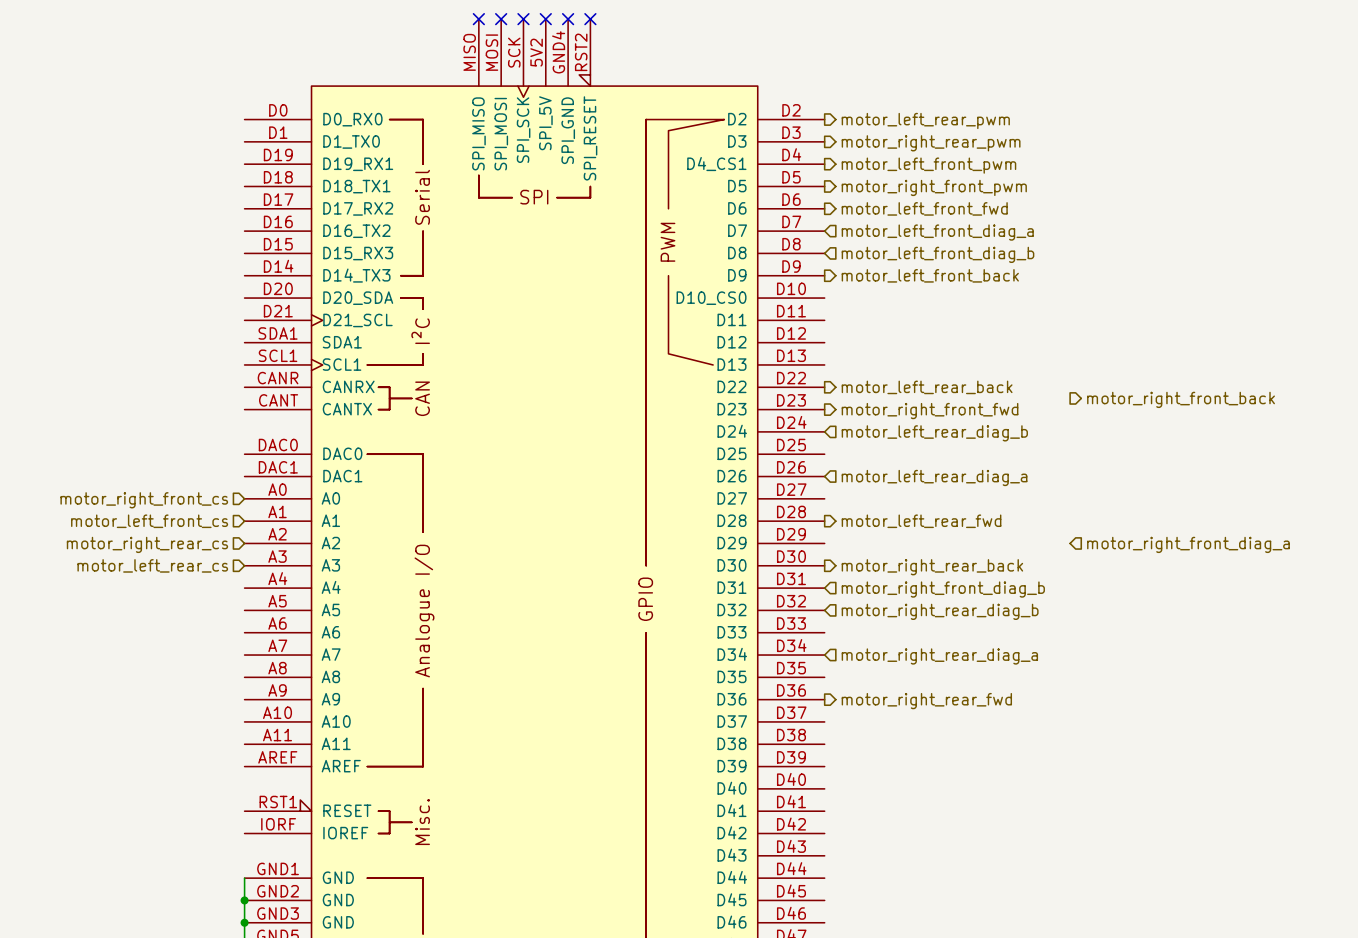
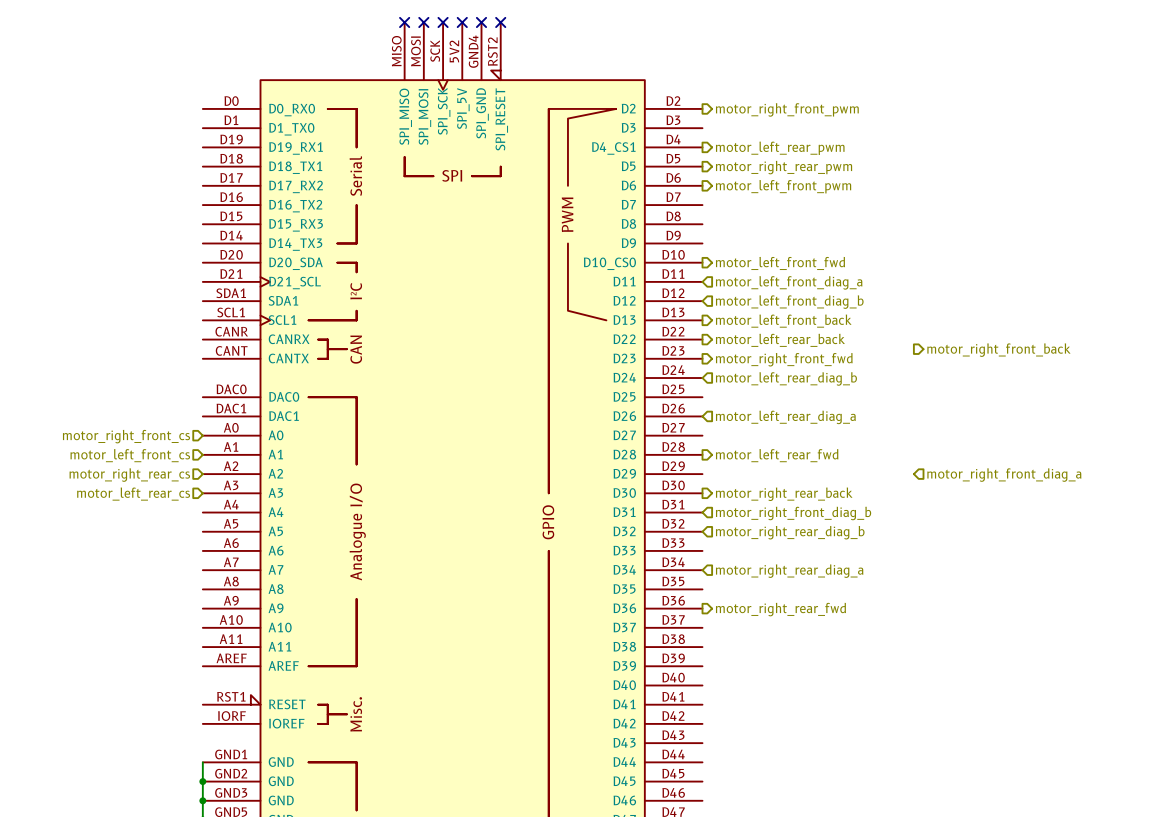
hierarchical label: motor_left_rear_pwm (925, 120) -> motor_right_front_pwm (787, 109)
hierarchical label: motor_right_rear_pwm (931, 143) -> none
hierarchical label: motor_left_front_pwm (928, 165) -> motor_left_rear_pwm (780, 148)
hierarchical label: motor_right_front_pwm (934, 187) -> motor_right_rear_pwm (784, 167)
hierarchical label: motor_left_front_fwd (924, 208) -> motor_left_front_pwm (783, 186)
hierarchical label position: motor_left_front_diag_a (937, 232) -> motor_left_front_diag_a (789, 282)
hierarchical label position: motor_left_front_diag_b (938, 254) -> motor_left_front_diag_b (789, 302)
hierarchical label position: motor_left_front_back (930, 275) -> motor_left_front_back (783, 321)
hierarchical label: none -> motor_left_front_fwd (780, 263)

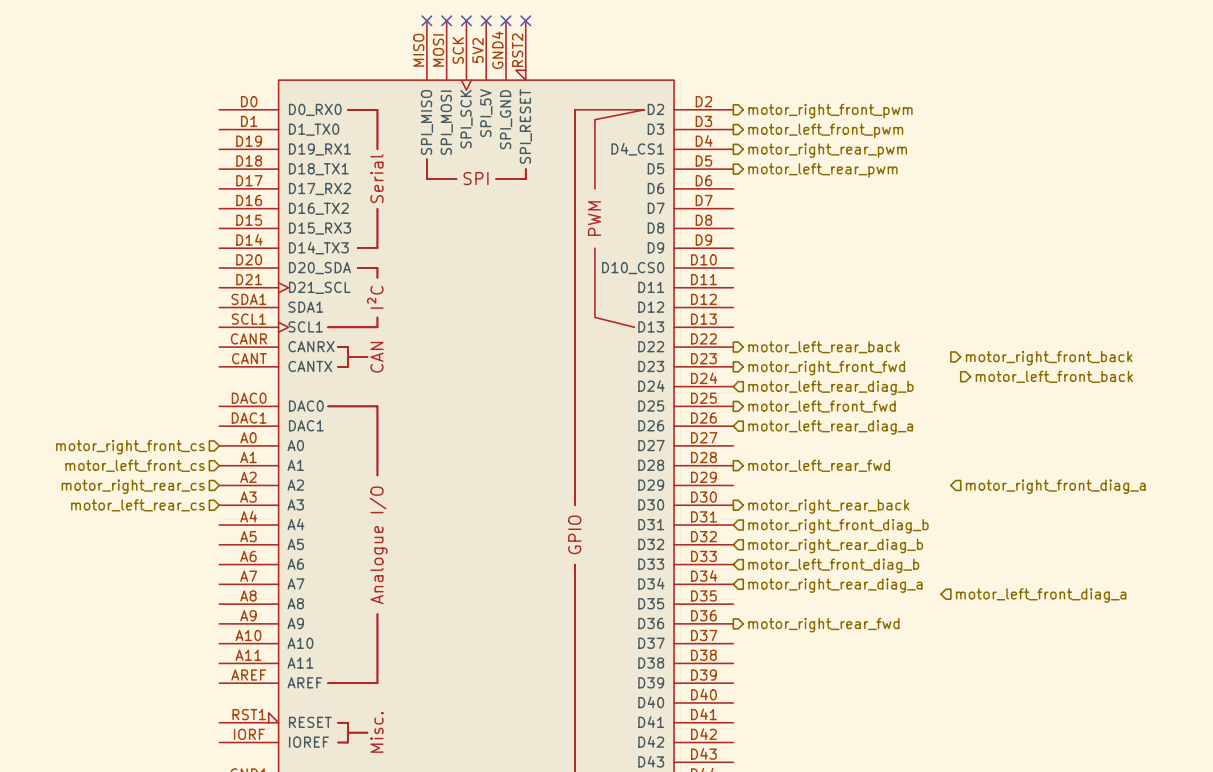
hierarchical label: motor_left_rear_pwm (780, 148) -> motor_right_rear_pwm (827, 150)
hierarchical label: motor_right_rear_pwm (784, 167) -> motor_left_rear_pwm (822, 170)
hierarchical label position: motor_left_front_pwm (783, 186) -> motor_left_front_pwm (825, 130)
hierarchical label position: motor_left_front_fwd (780, 263) -> motor_left_front_fwd (822, 406)
hierarchical label: motor_left_front_diag_a (789, 282) -> none
hierarchical label: motor_left_front_diag_b (789, 302) -> none
hierarchical label: motor_left_front_back (783, 321) -> none
hierarchical label: none -> motor_left_front_back (1054, 376)
hierarchical label: none -> motor_left_front_diag_b (833, 565)
hierarchical label: none -> motor_left_front_diag_a (1041, 595)

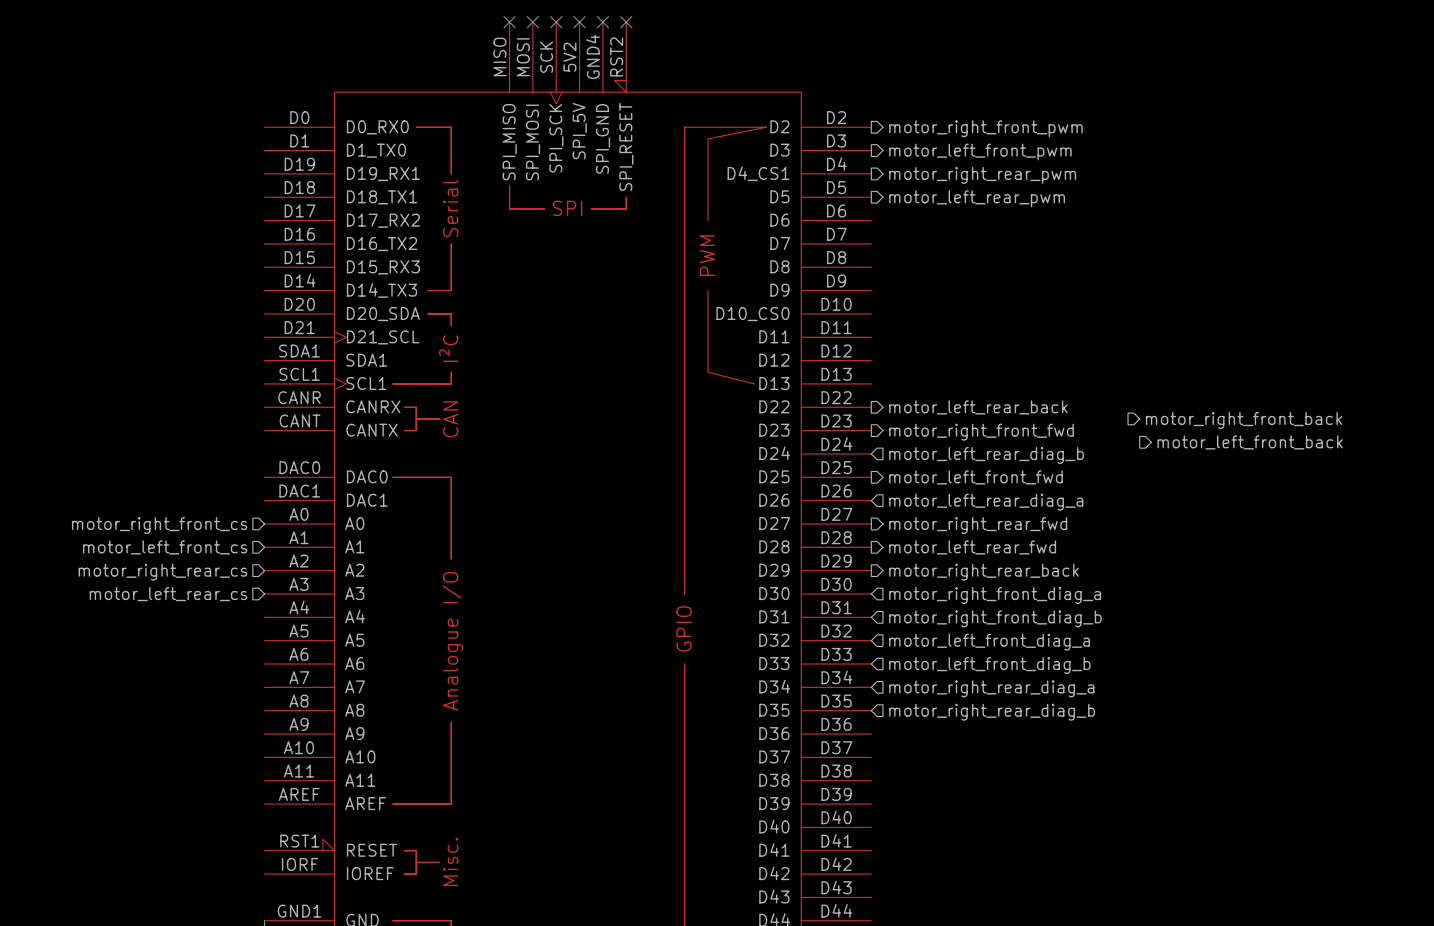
hierarchical label: none -> motor_right_rear_back (984, 572)
hierarchical label: motor_right_front_diag_a (1055, 486) -> none
hierarchical label shape: output (828, 506) -> input (995, 595)
hierarchical label: motor_right_rear_back (828, 506) -> motor_right_front_diag_a (995, 595)
hierarchical label: motor_right_rear_diag_b (835, 546) -> motor_left_front_diag_a (989, 642)
hierarchical label: motor_left_front_diag_a (1041, 595) -> none
hierarchical label: none -> motor_right_rear_diag_b (992, 712)
hierarchical label position: motor_right_rear_fwd (823, 625) -> motor_right_rear_fwd (978, 525)

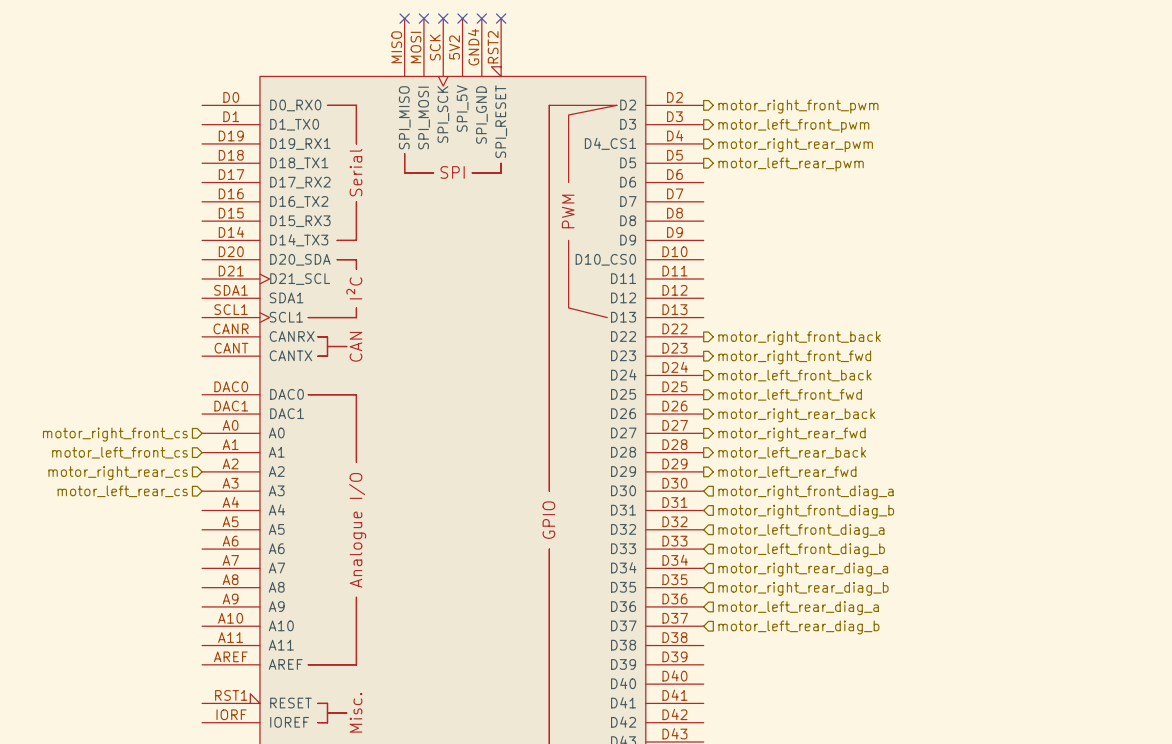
hierarchical label: motor_left_rear_back (978, 407) -> motor_right_front_back (799, 338)
hierarchical label: motor_right_front_back (1244, 420) -> none
hierarchical label: motor_left_front_back (1250, 442) -> none
hierarchical label shape: input (986, 455) -> output (795, 375)
hierarchical label: motor_left_rear_diag_b (986, 455) -> motor_left_front_back (795, 375)
hierarchical label shape: input (986, 502) -> output (796, 415)
hierarchical label: motor_left_rear_diag_a (986, 502) -> motor_right_rear_back (796, 415)
hierarchical label: motor_left_rear_fwd (972, 547) -> motor_left_rear_back (792, 452)
hierarchical label: motor_right_rear_back (984, 572) -> motor_left_rear_fwd (787, 472)
hierarchical label: none -> motor_left_rear_diag_a (798, 608)
hierarchical label: none -> motor_left_rear_diag_b (798, 627)

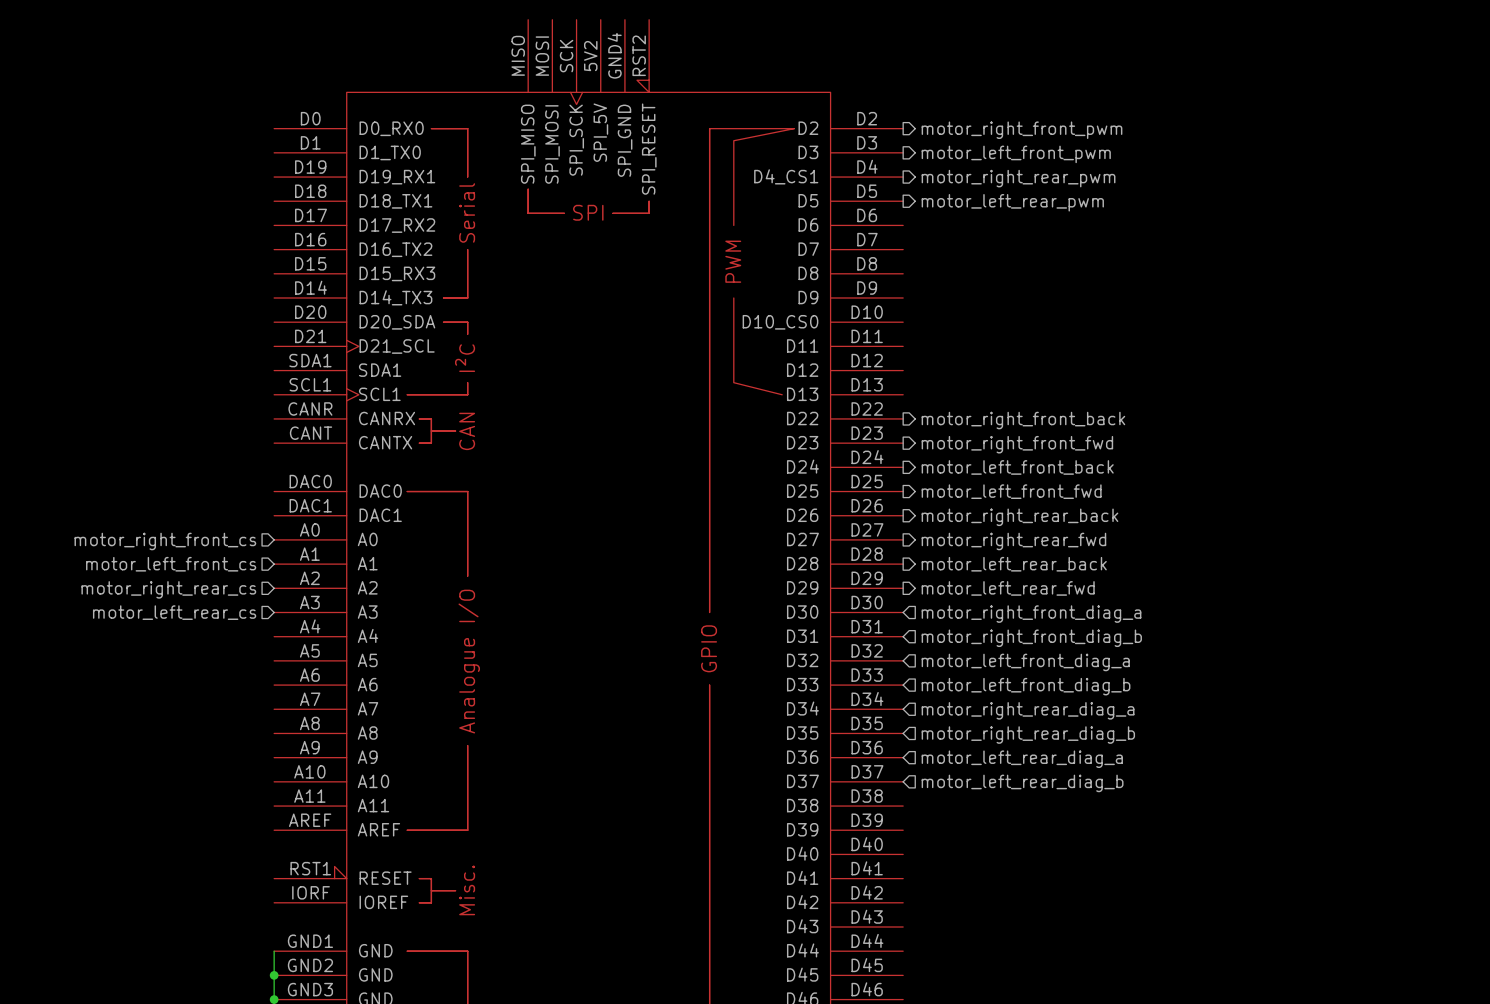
no-connect mark: (404, 18) -> none
no-connect mark: (423, 18) -> none
no-connect mark: (443, 18) -> none
no-connect mark: (462, 18) -> none
no-connect mark: (481, 18) -> none
no-connect mark: (501, 18) -> none

